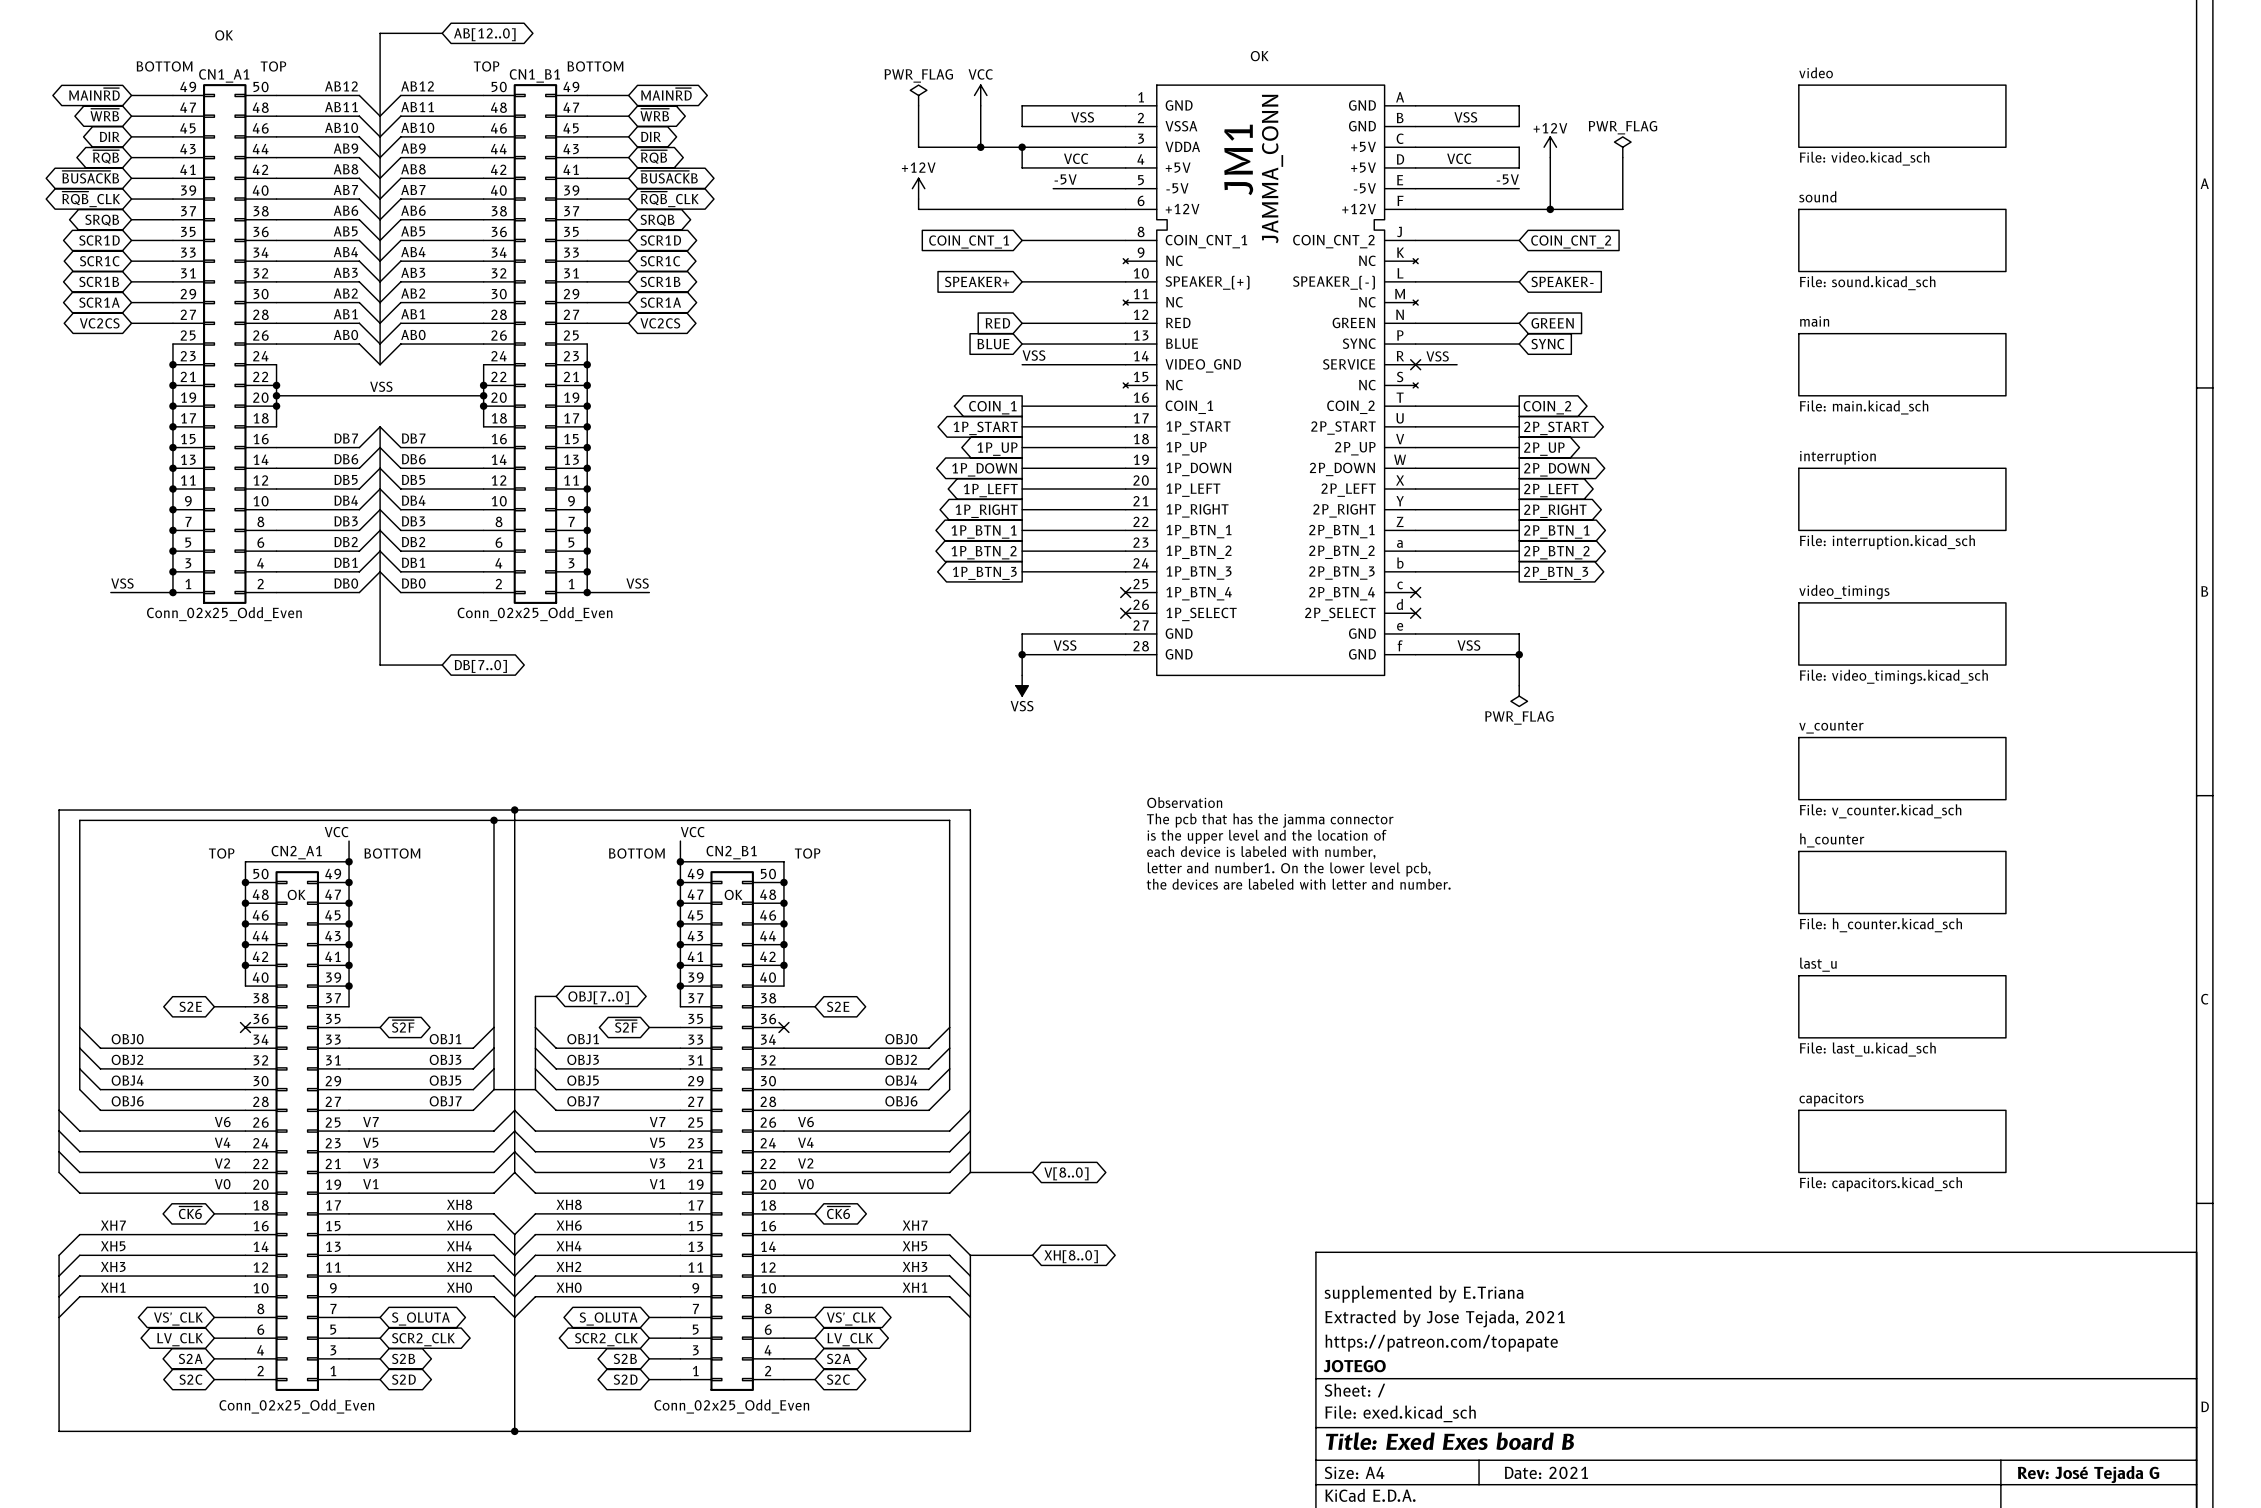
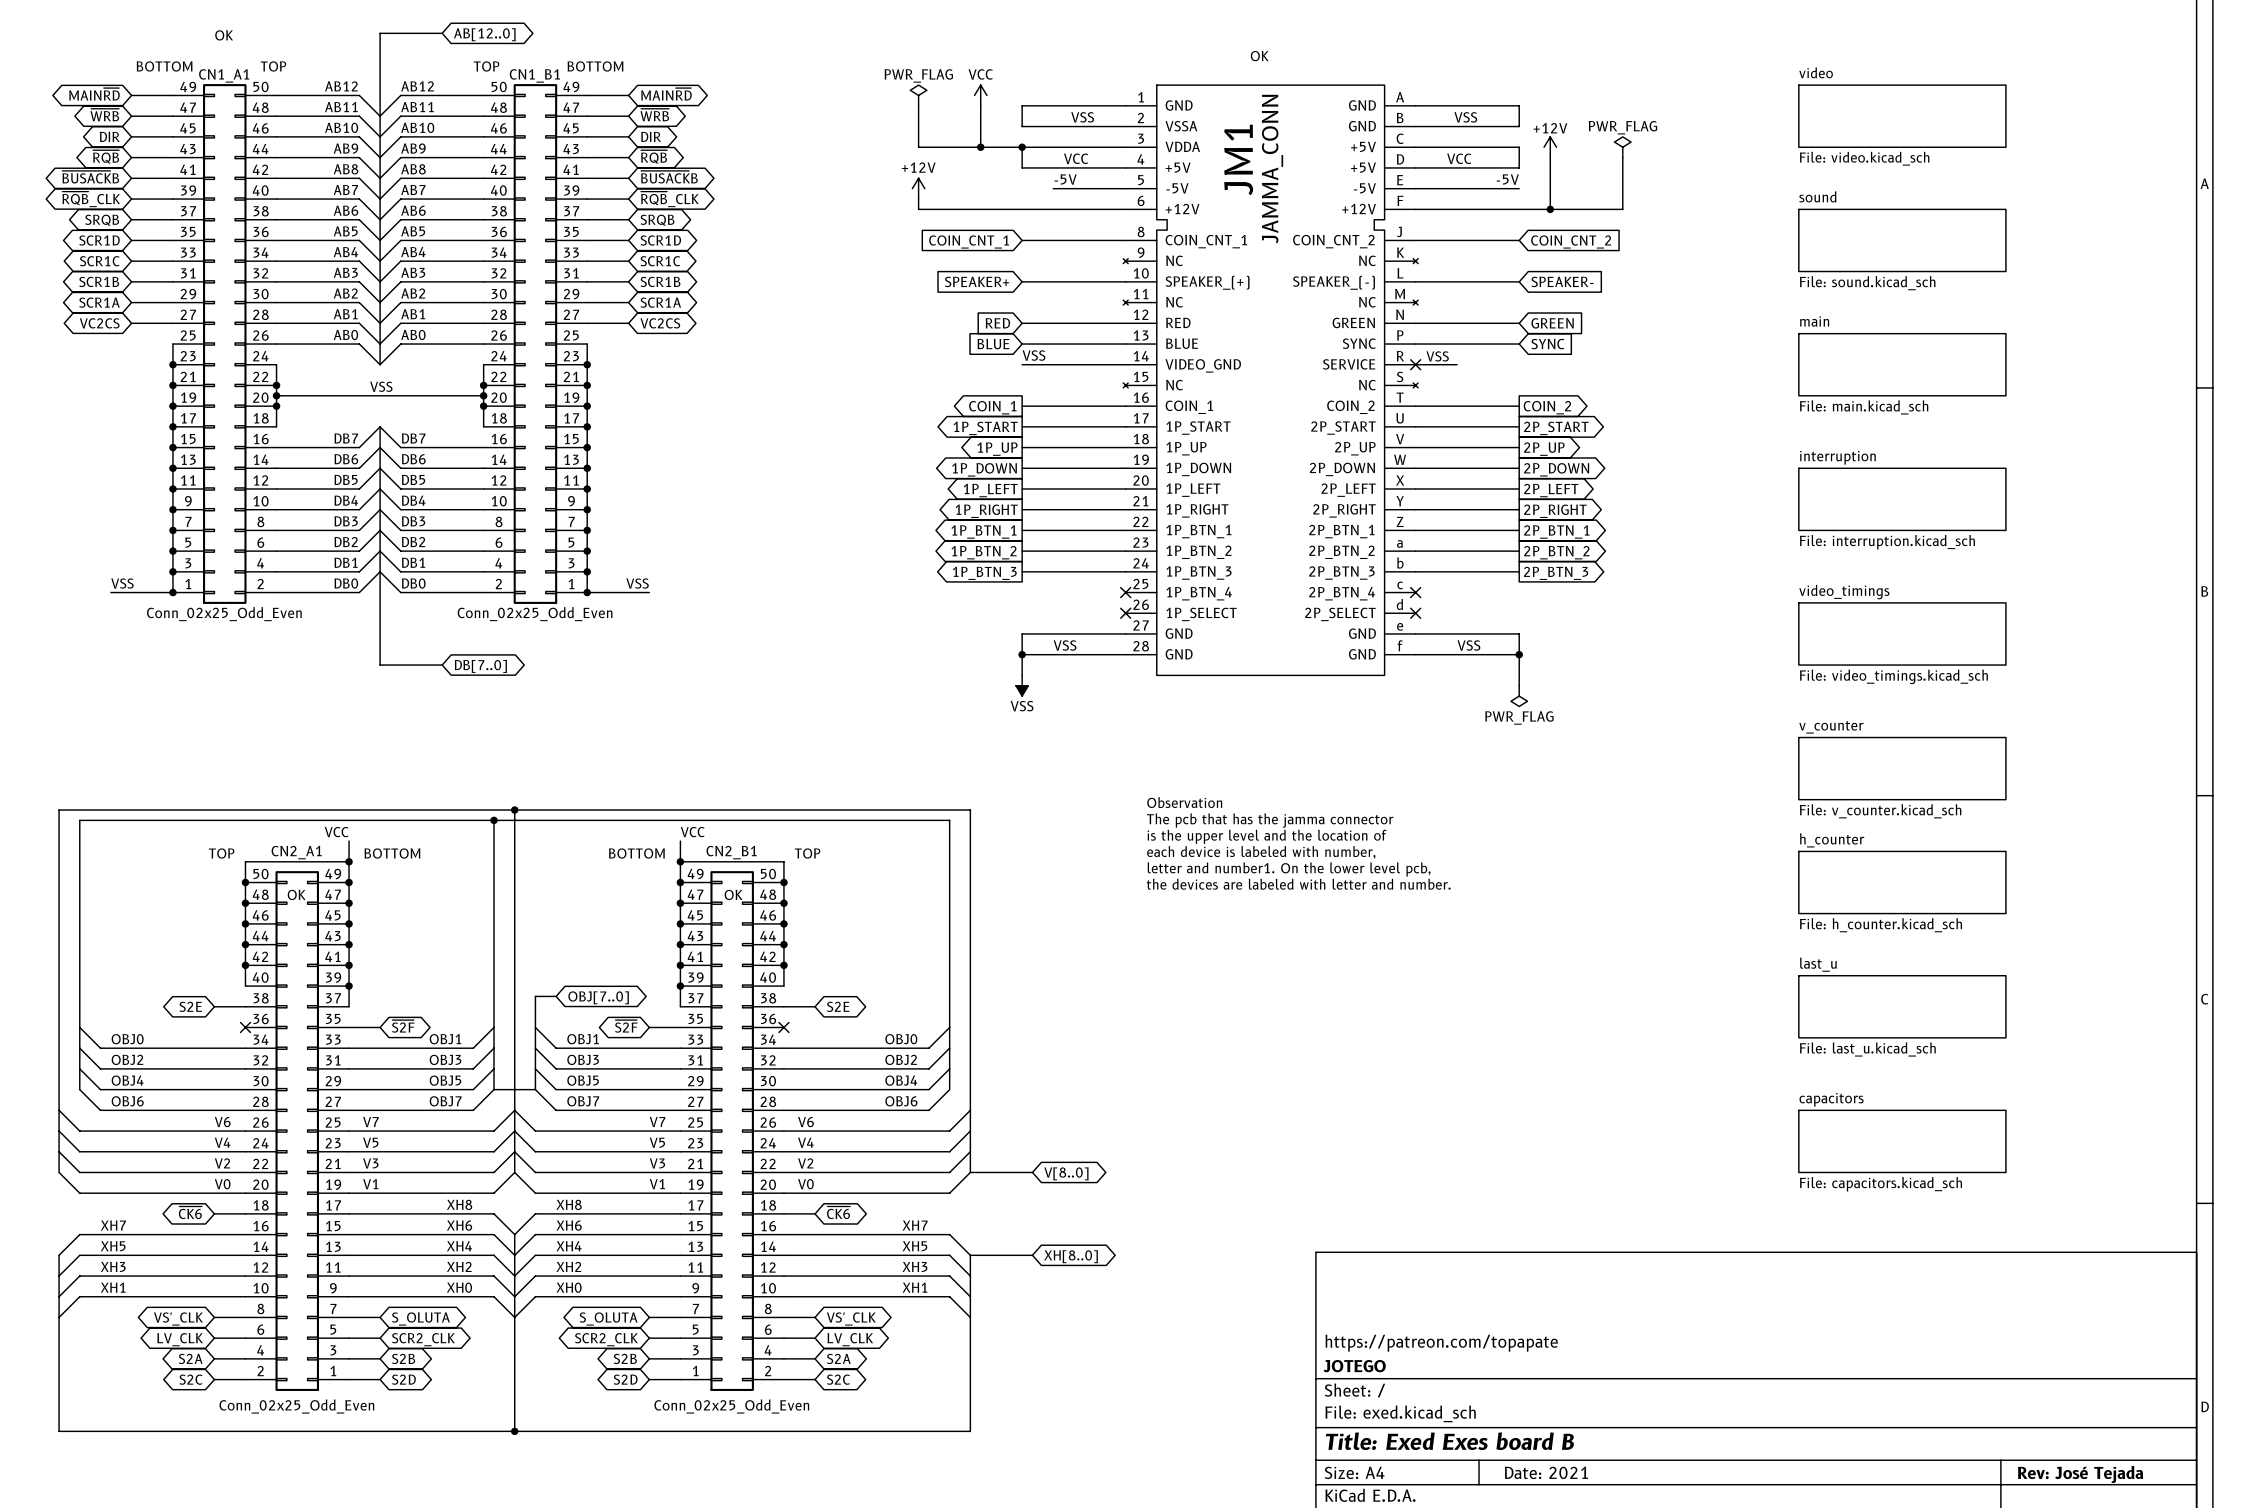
title block: supplemented by E.Triana (1424, 1294) -> none
title block: Extracted by Jose Tejada, 2021 (1445, 1318) -> none
title block: Rev: José Tejada G (2088, 1474) -> Rev: José Tejada (2080, 1474)

